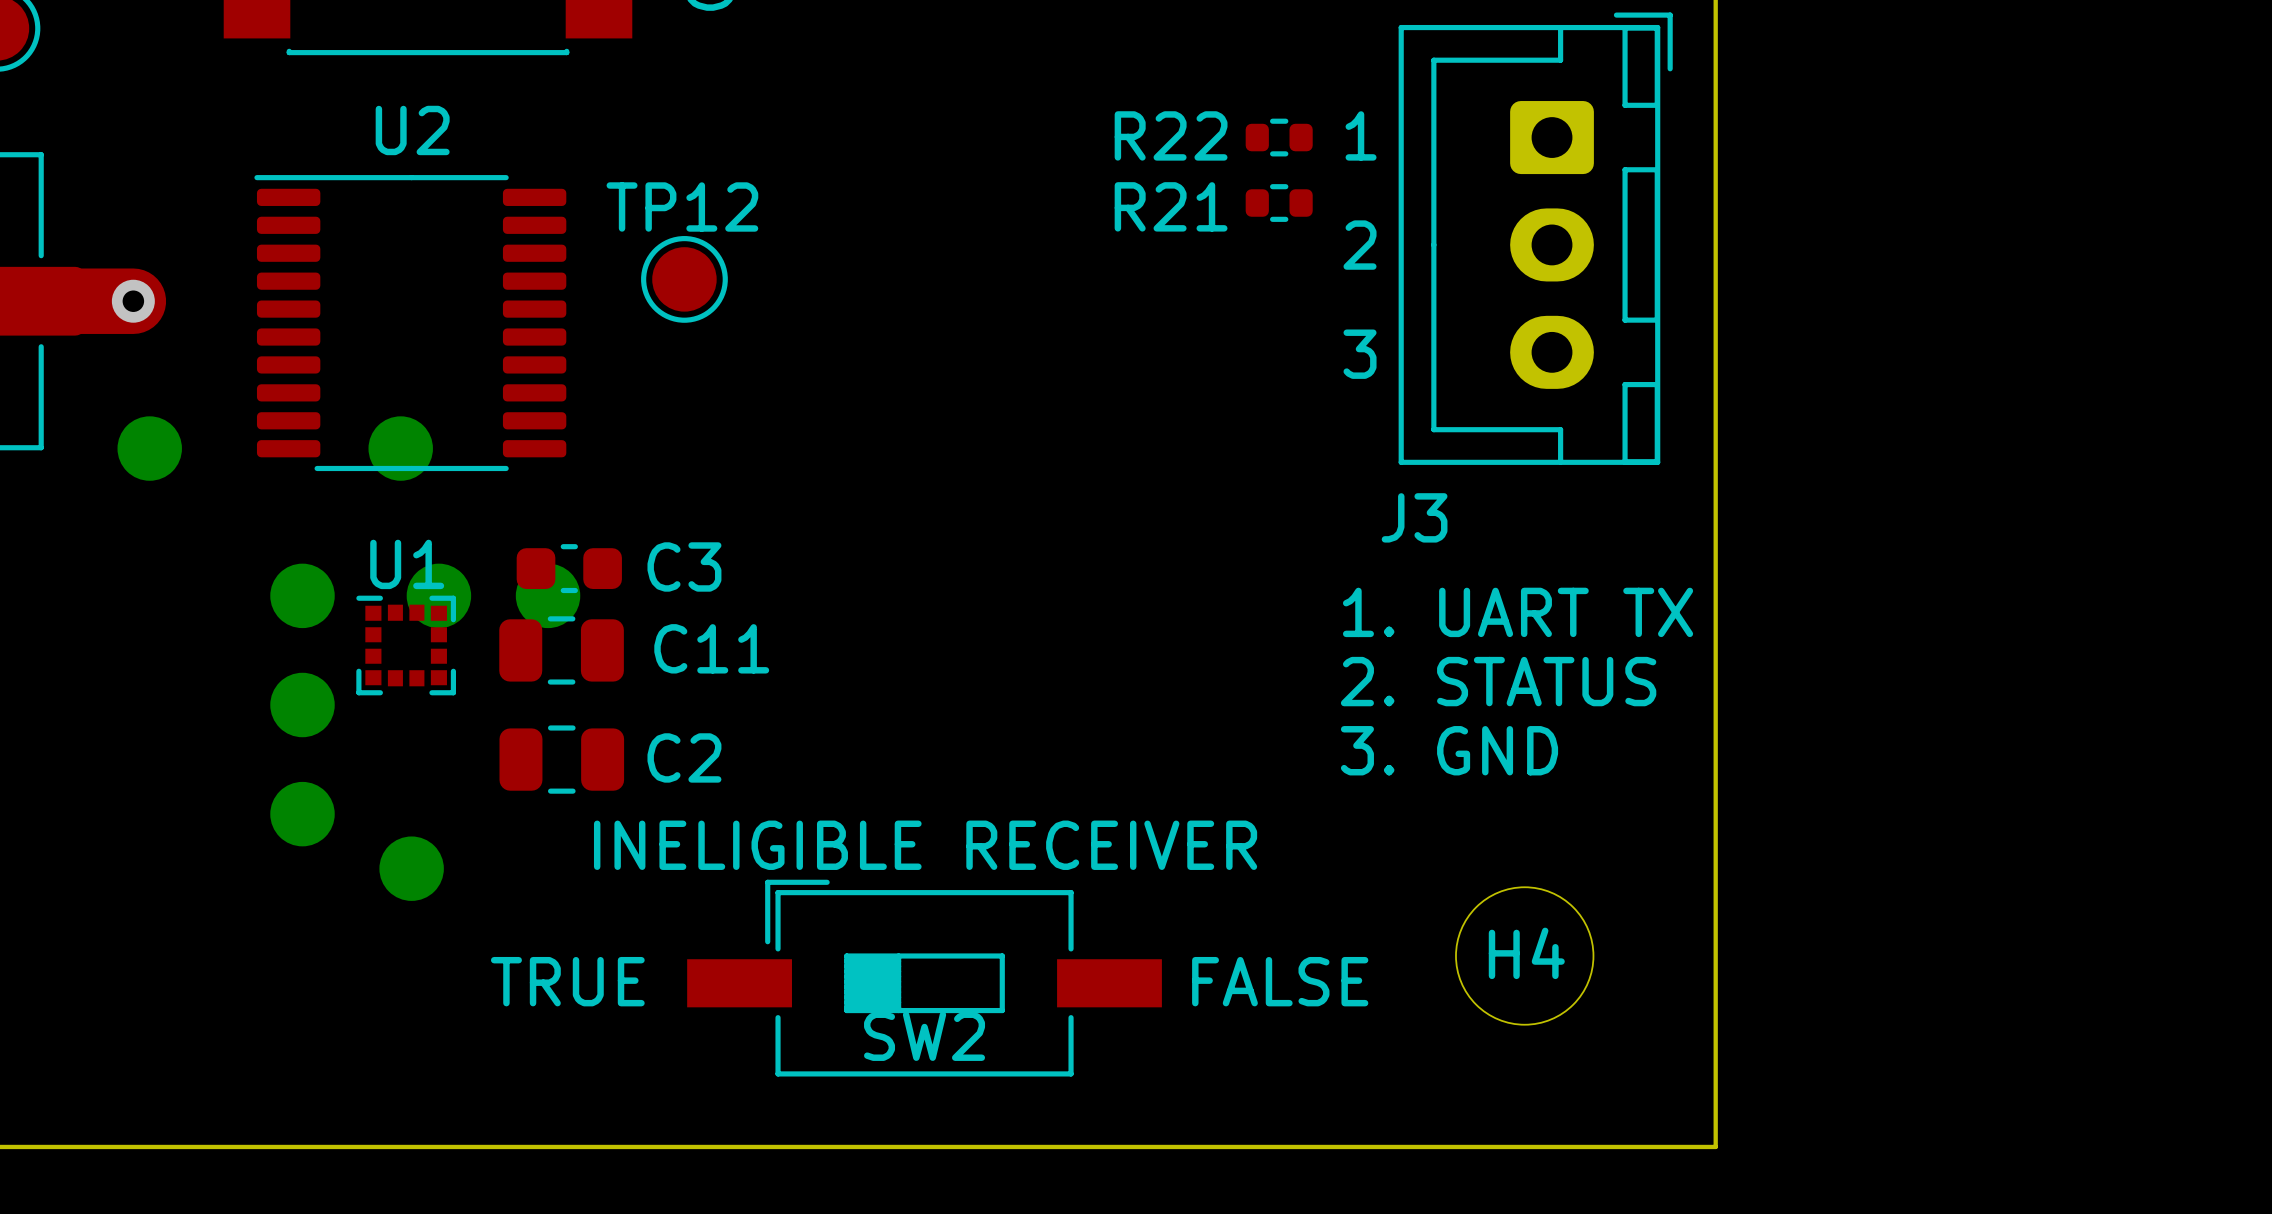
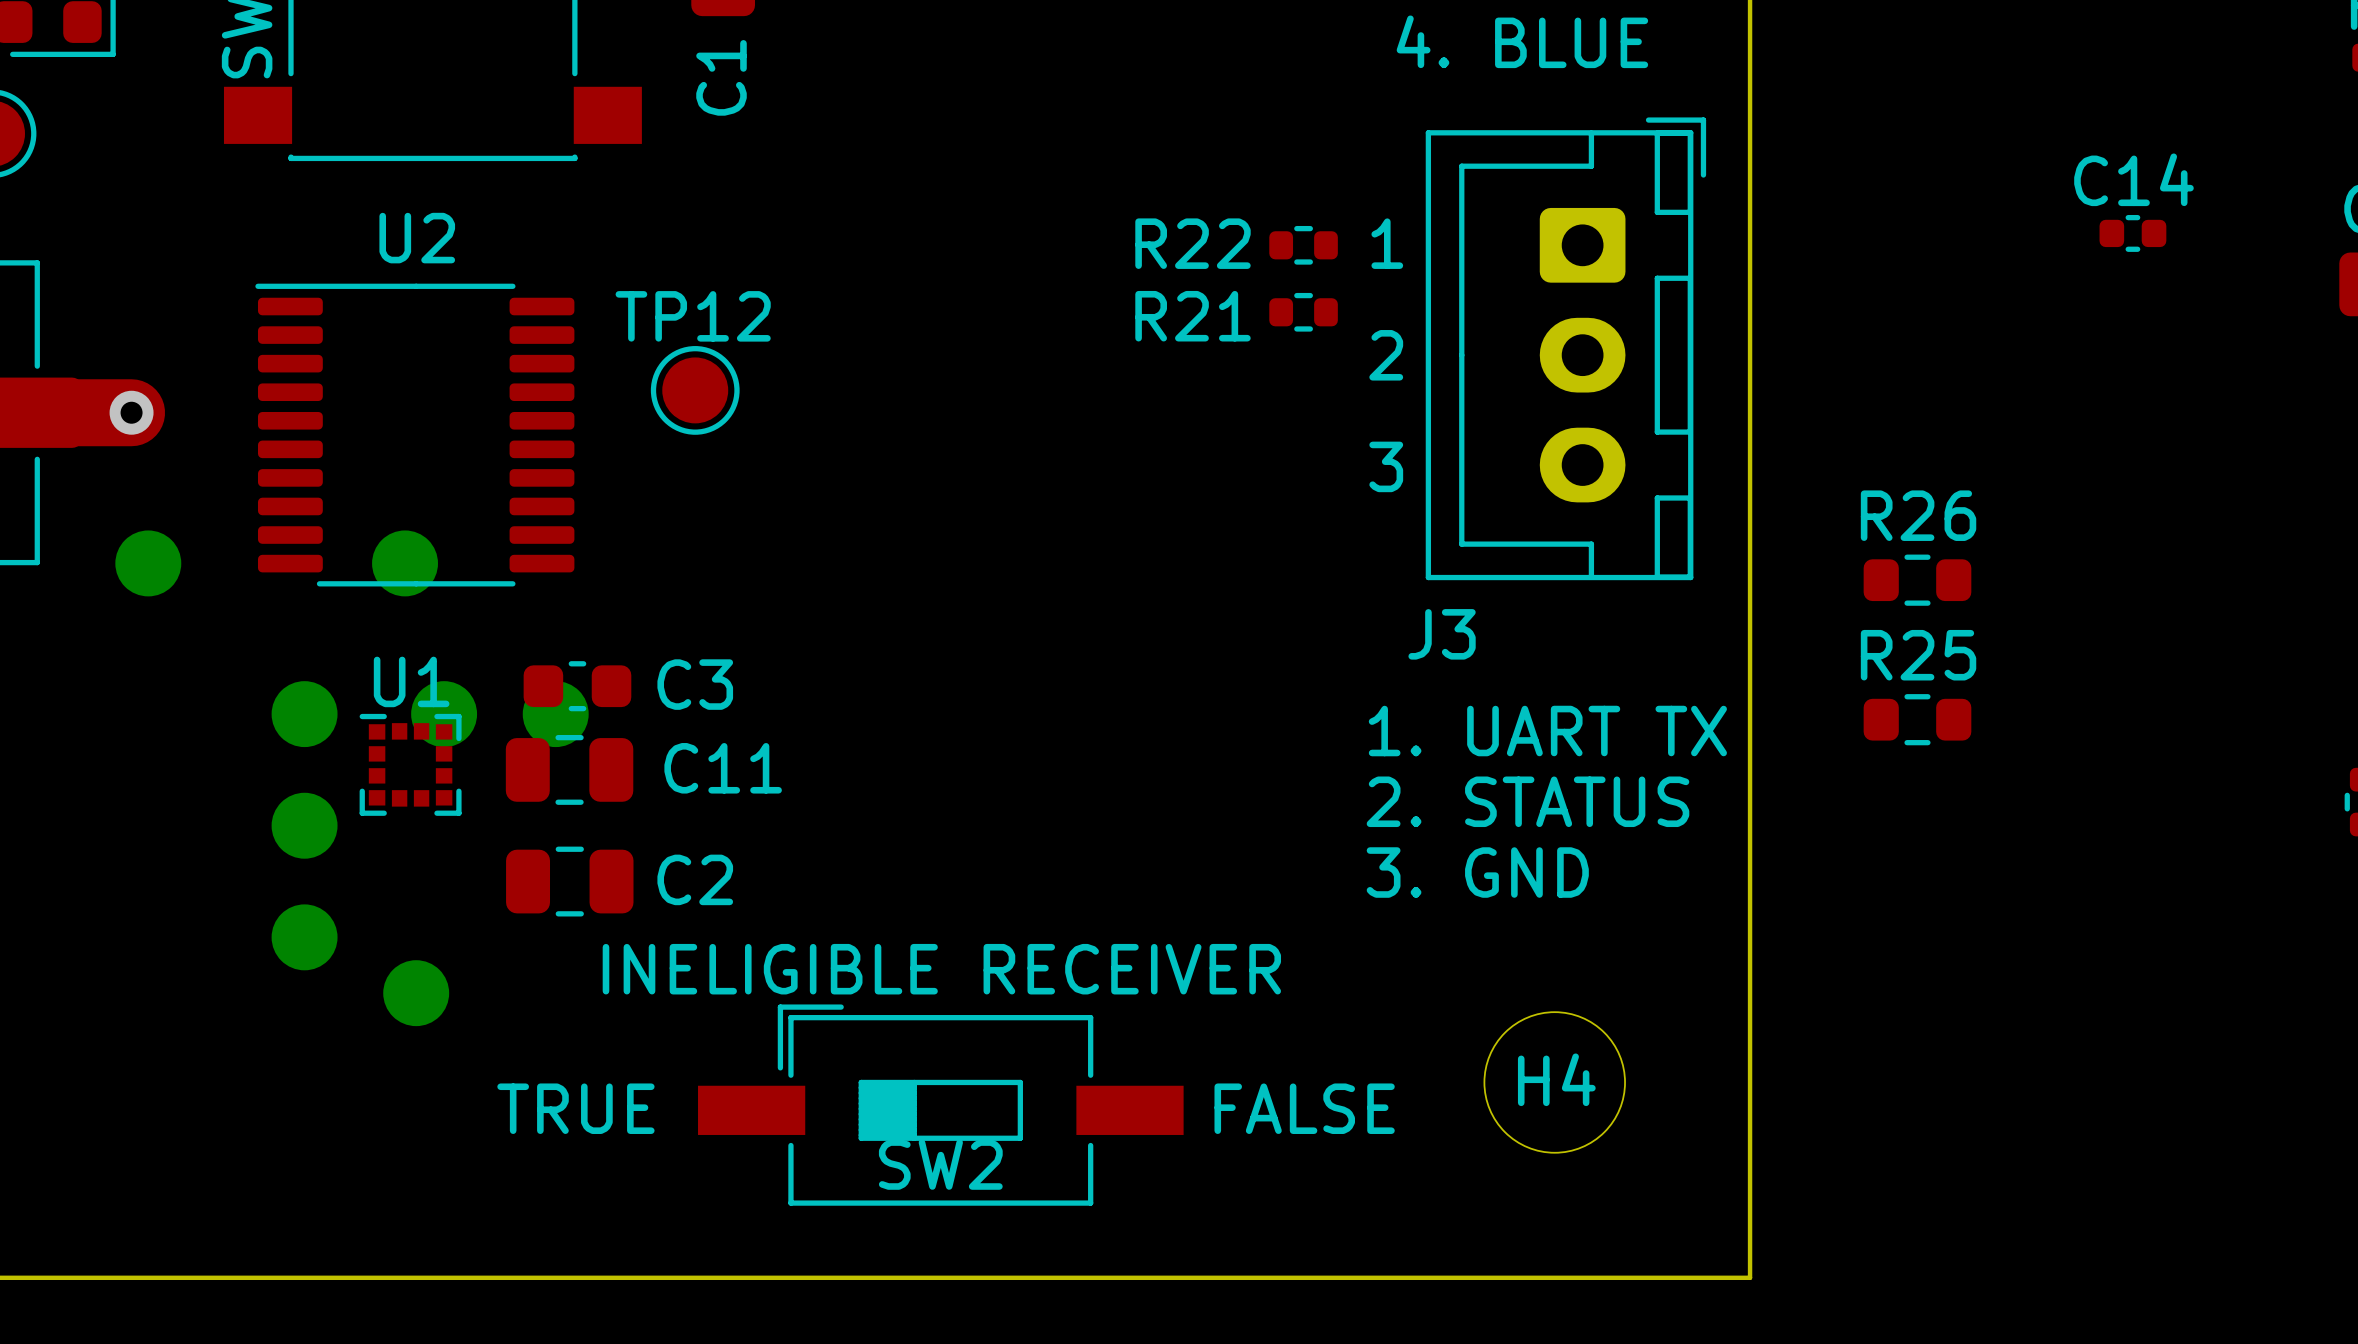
C14: none -> (2132, 233)
R26: none -> (1917, 580)
R25: none -> (1917, 719)

